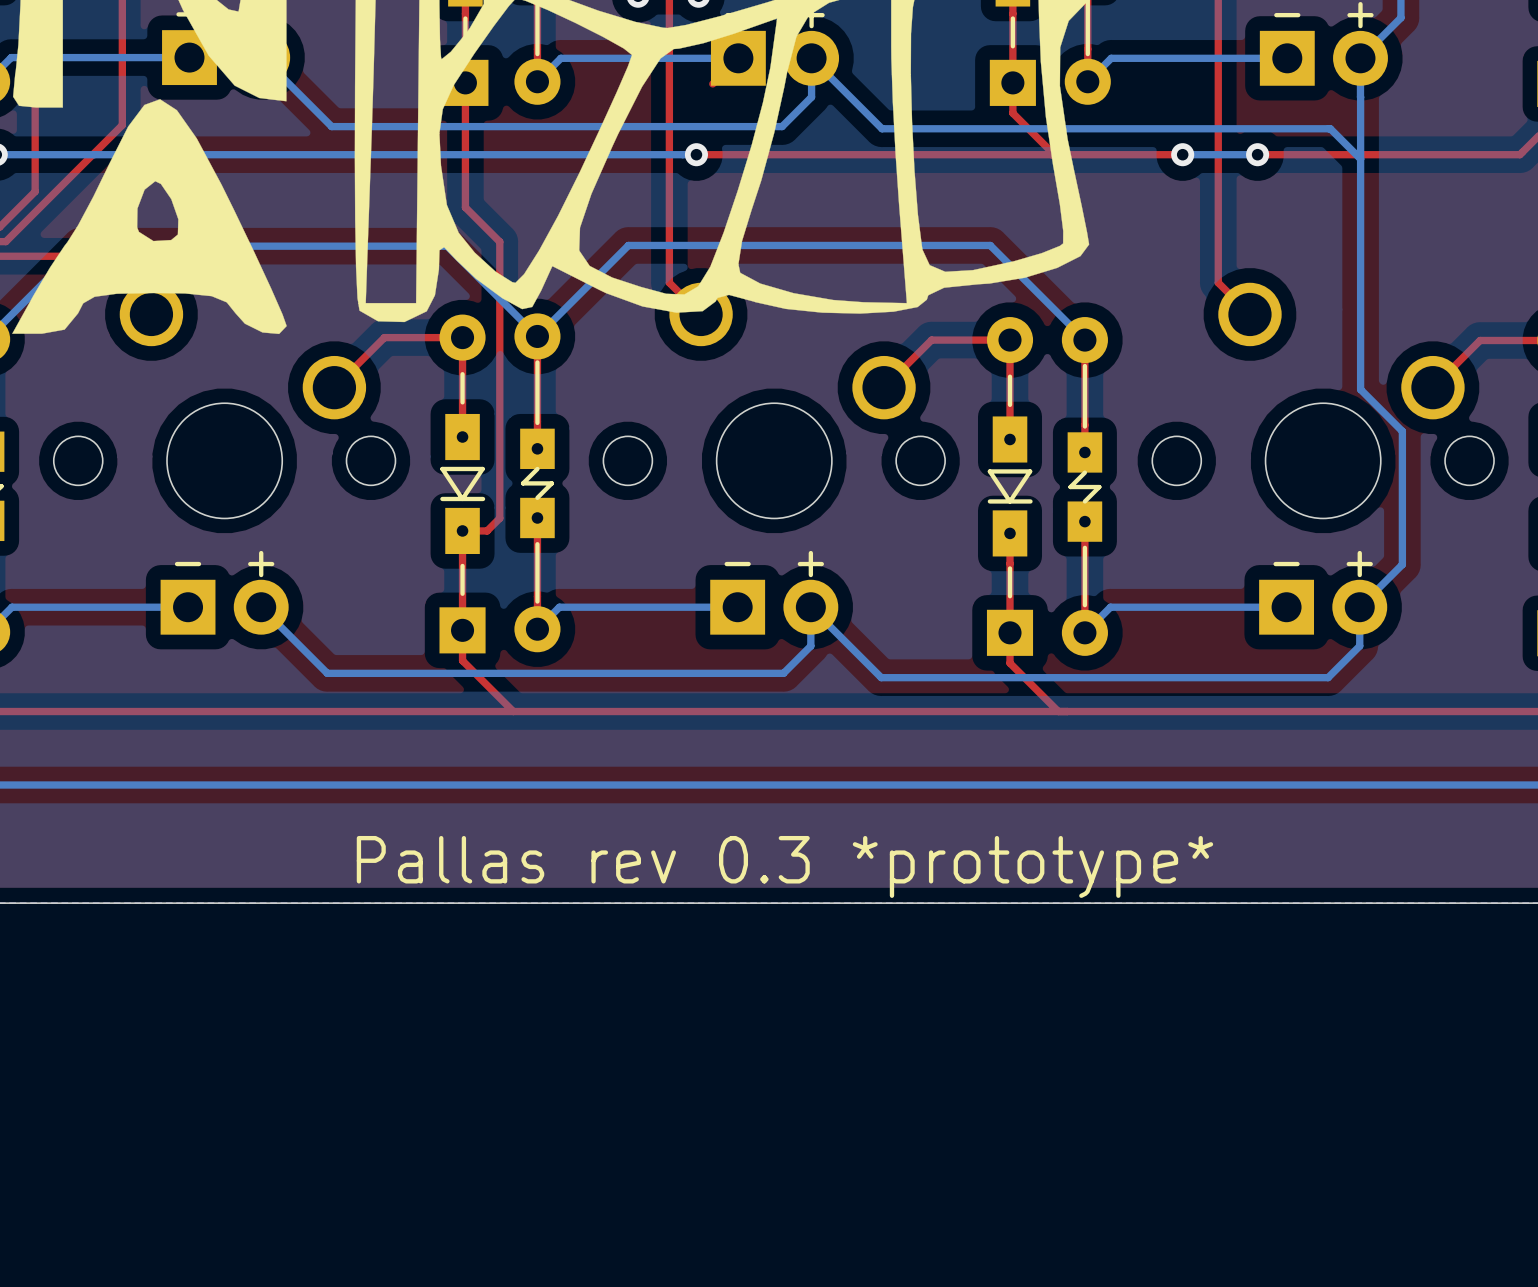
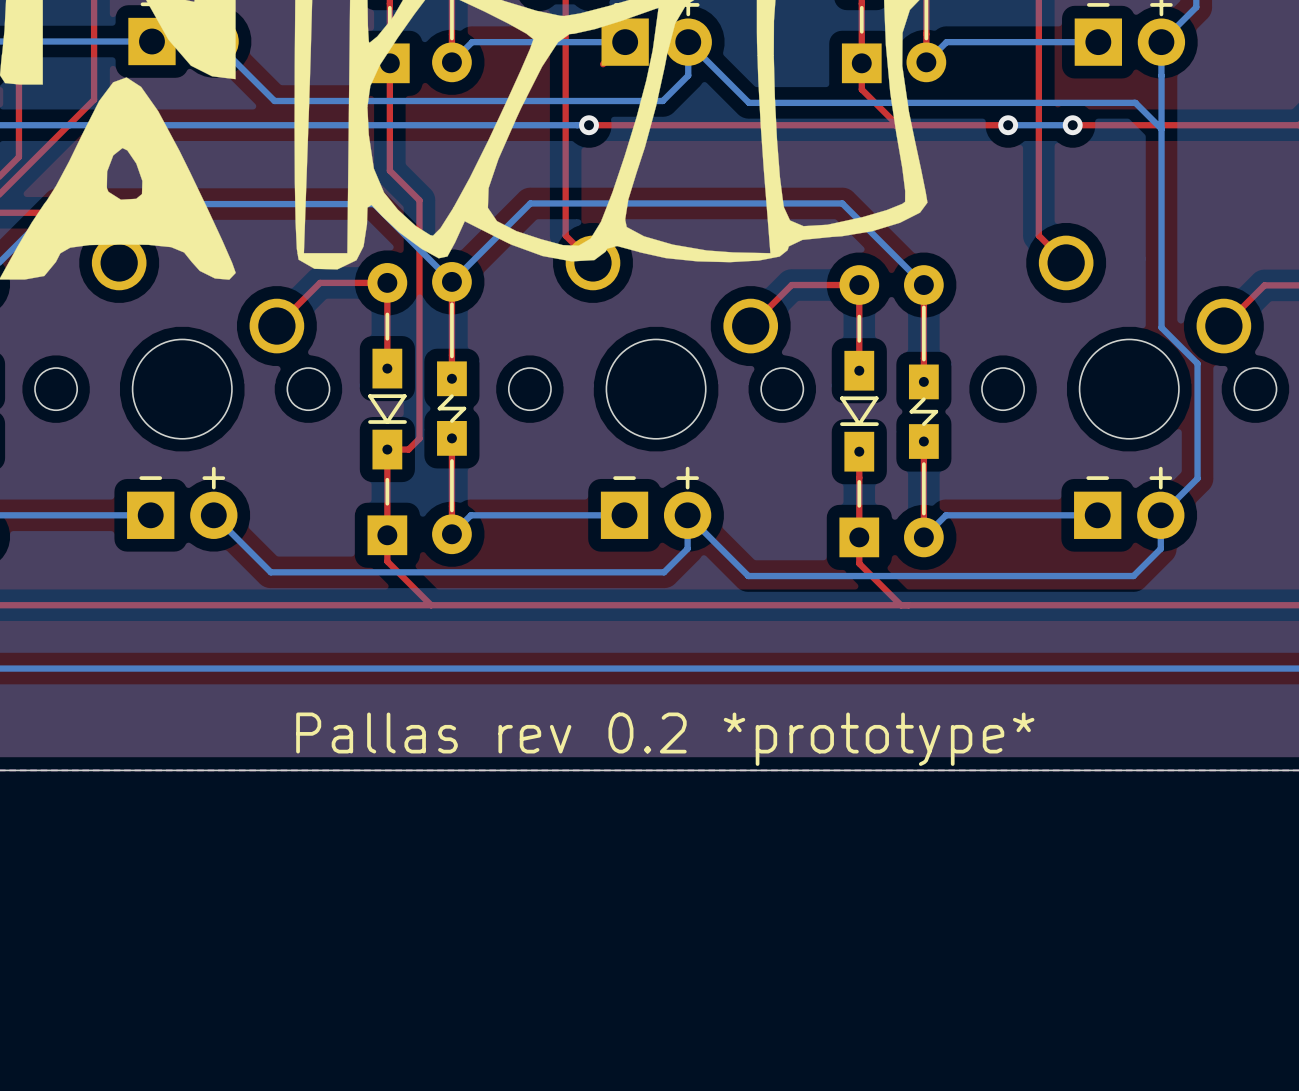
text: Pallas rev 0.3 *prototype* (784, 866) -> Pallas rev 0.2 *prototype* (665, 739)

